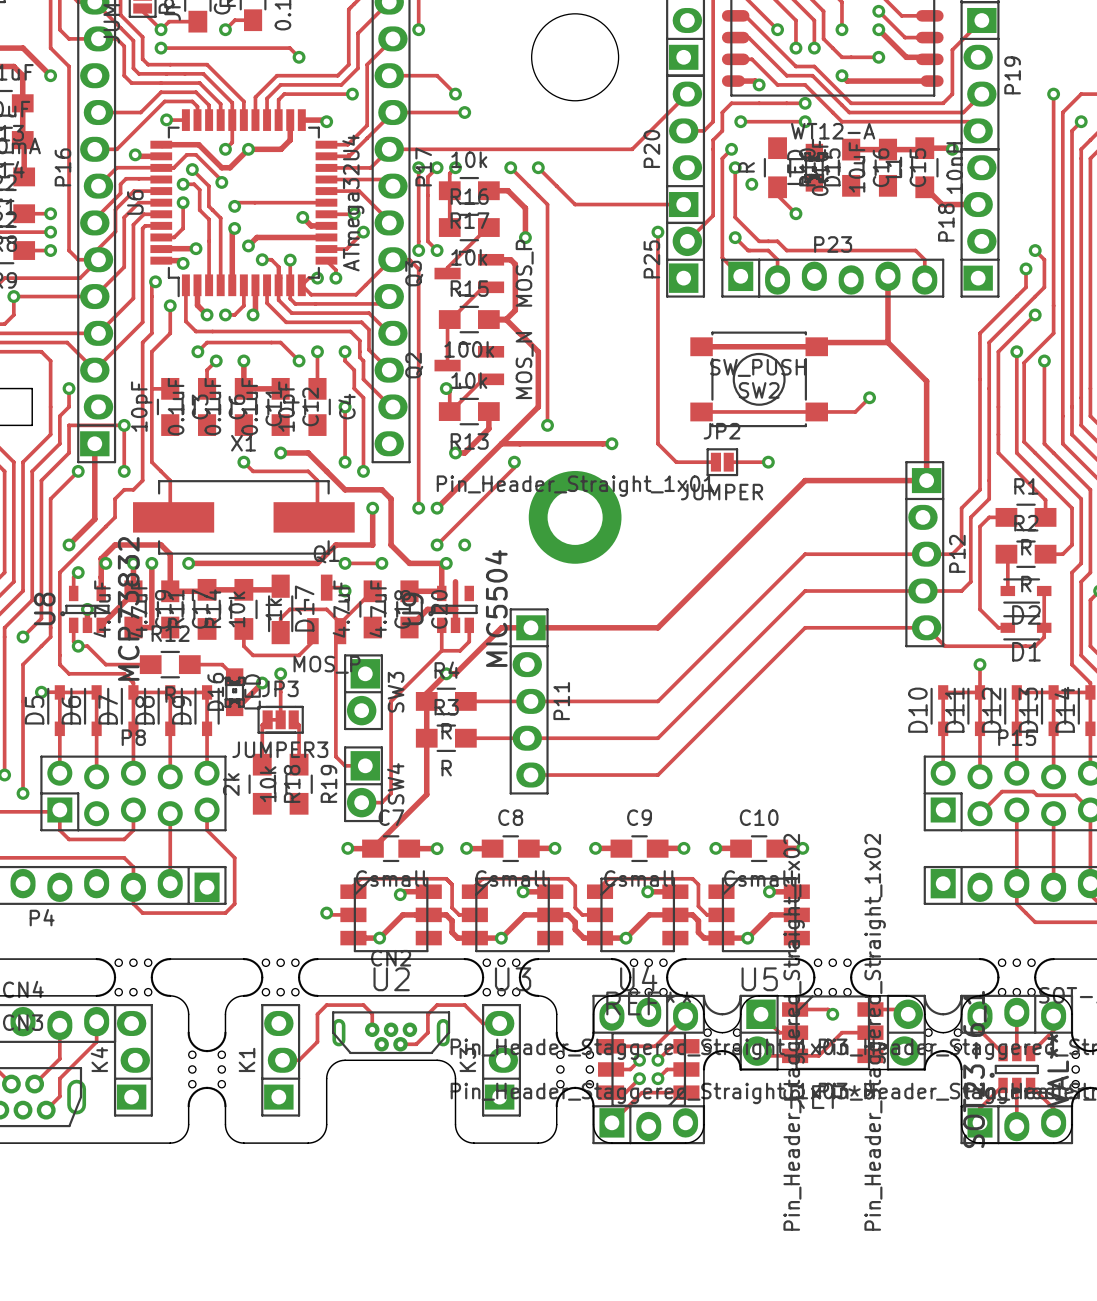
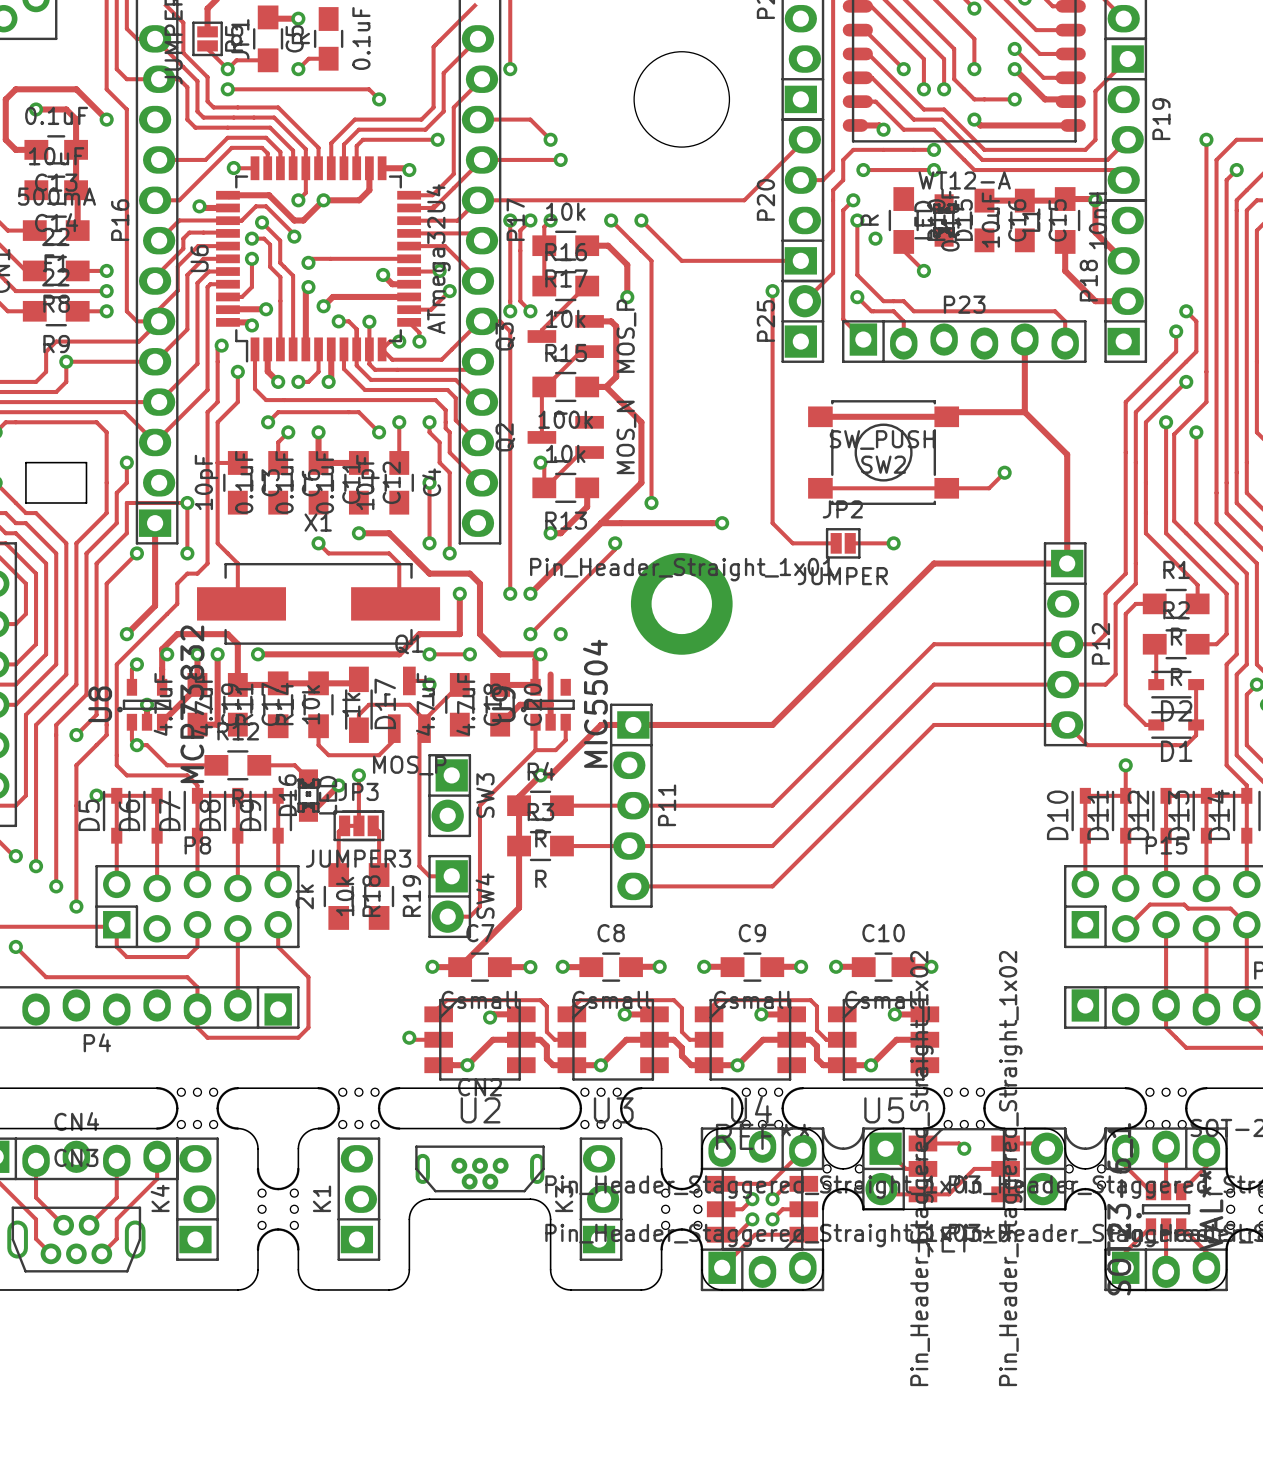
track: none -> (1095, 200) (1095, 232)
track: none -> (1095, 232) (1123, 260) (1095, 232)
track: (924, 187) (942, 204) (978, 204) -> (1065, 241) (1065, 270) (1095, 301) (1127, 301)
track: (492, 1023) (483, 1023) (464, 1005) (437, 1005) (427, 1014) (427, 1032) (416, 1044) (400, 1044) -> none
track: (372, 1029) (372, 1013) (363, 1005) (326, 1005) (317, 1014) (317, 1041) (299, 1060) (282, 1060) -> none

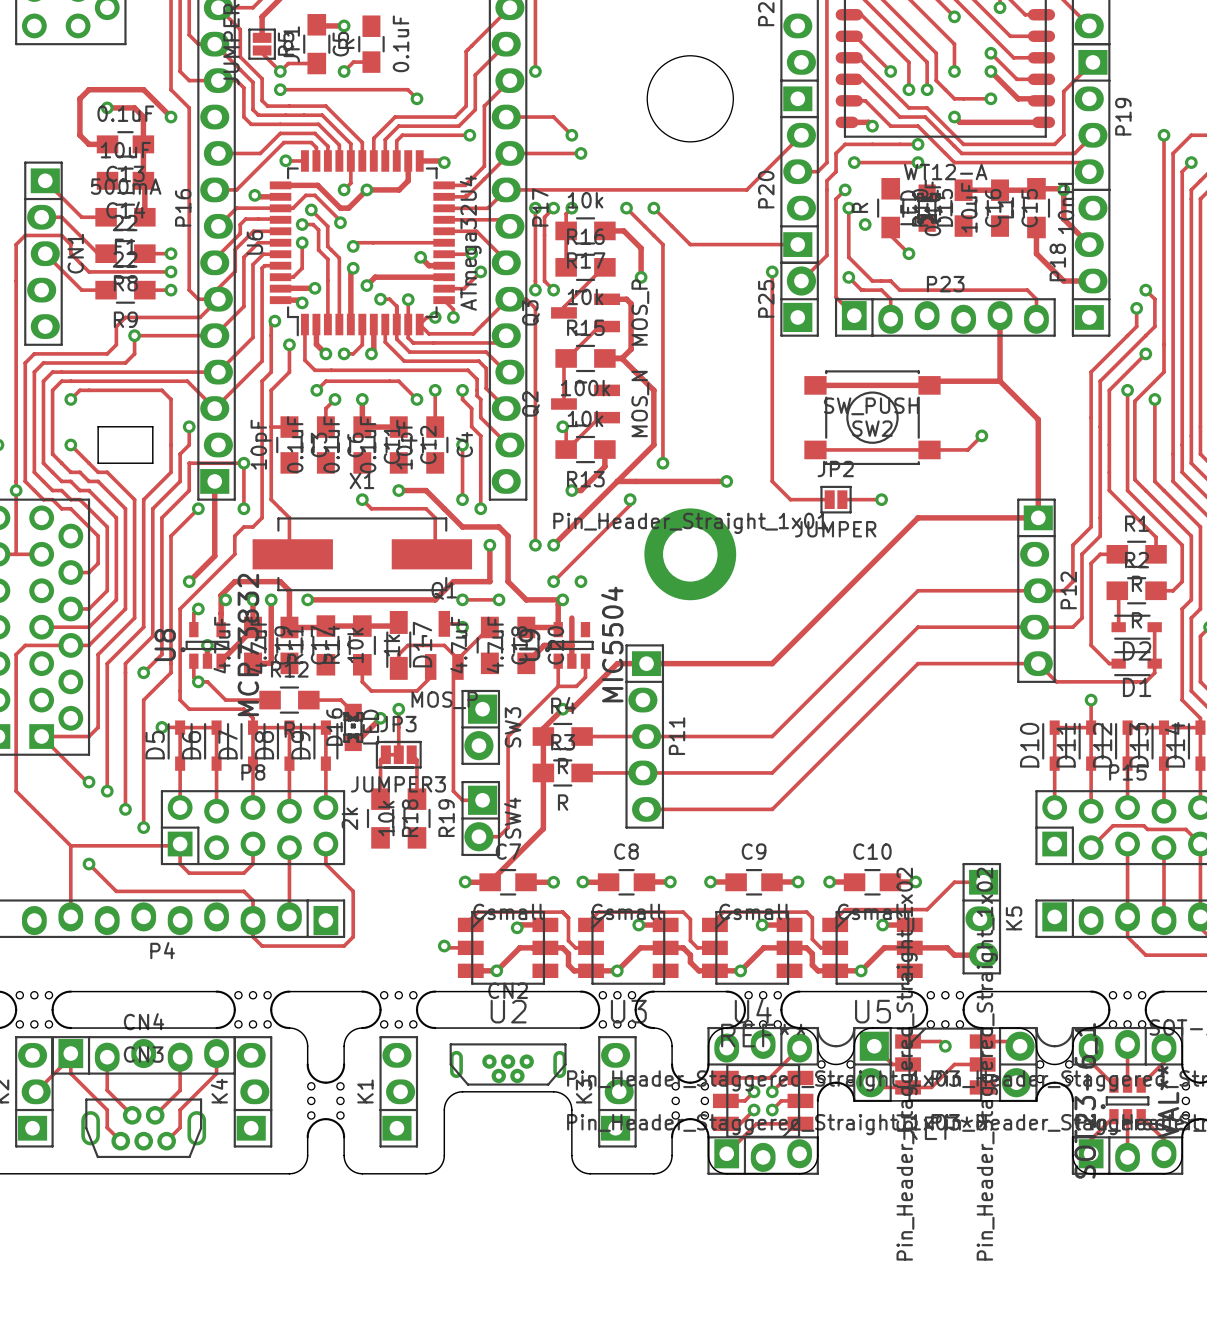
track: none -> (983, 882) (954, 882) (927, 909) (845, 909) (835, 919) (835, 924)
K5: none -> (981, 918)
track: none -> (909, 947) (947, 947) (954, 955) (983, 955)

